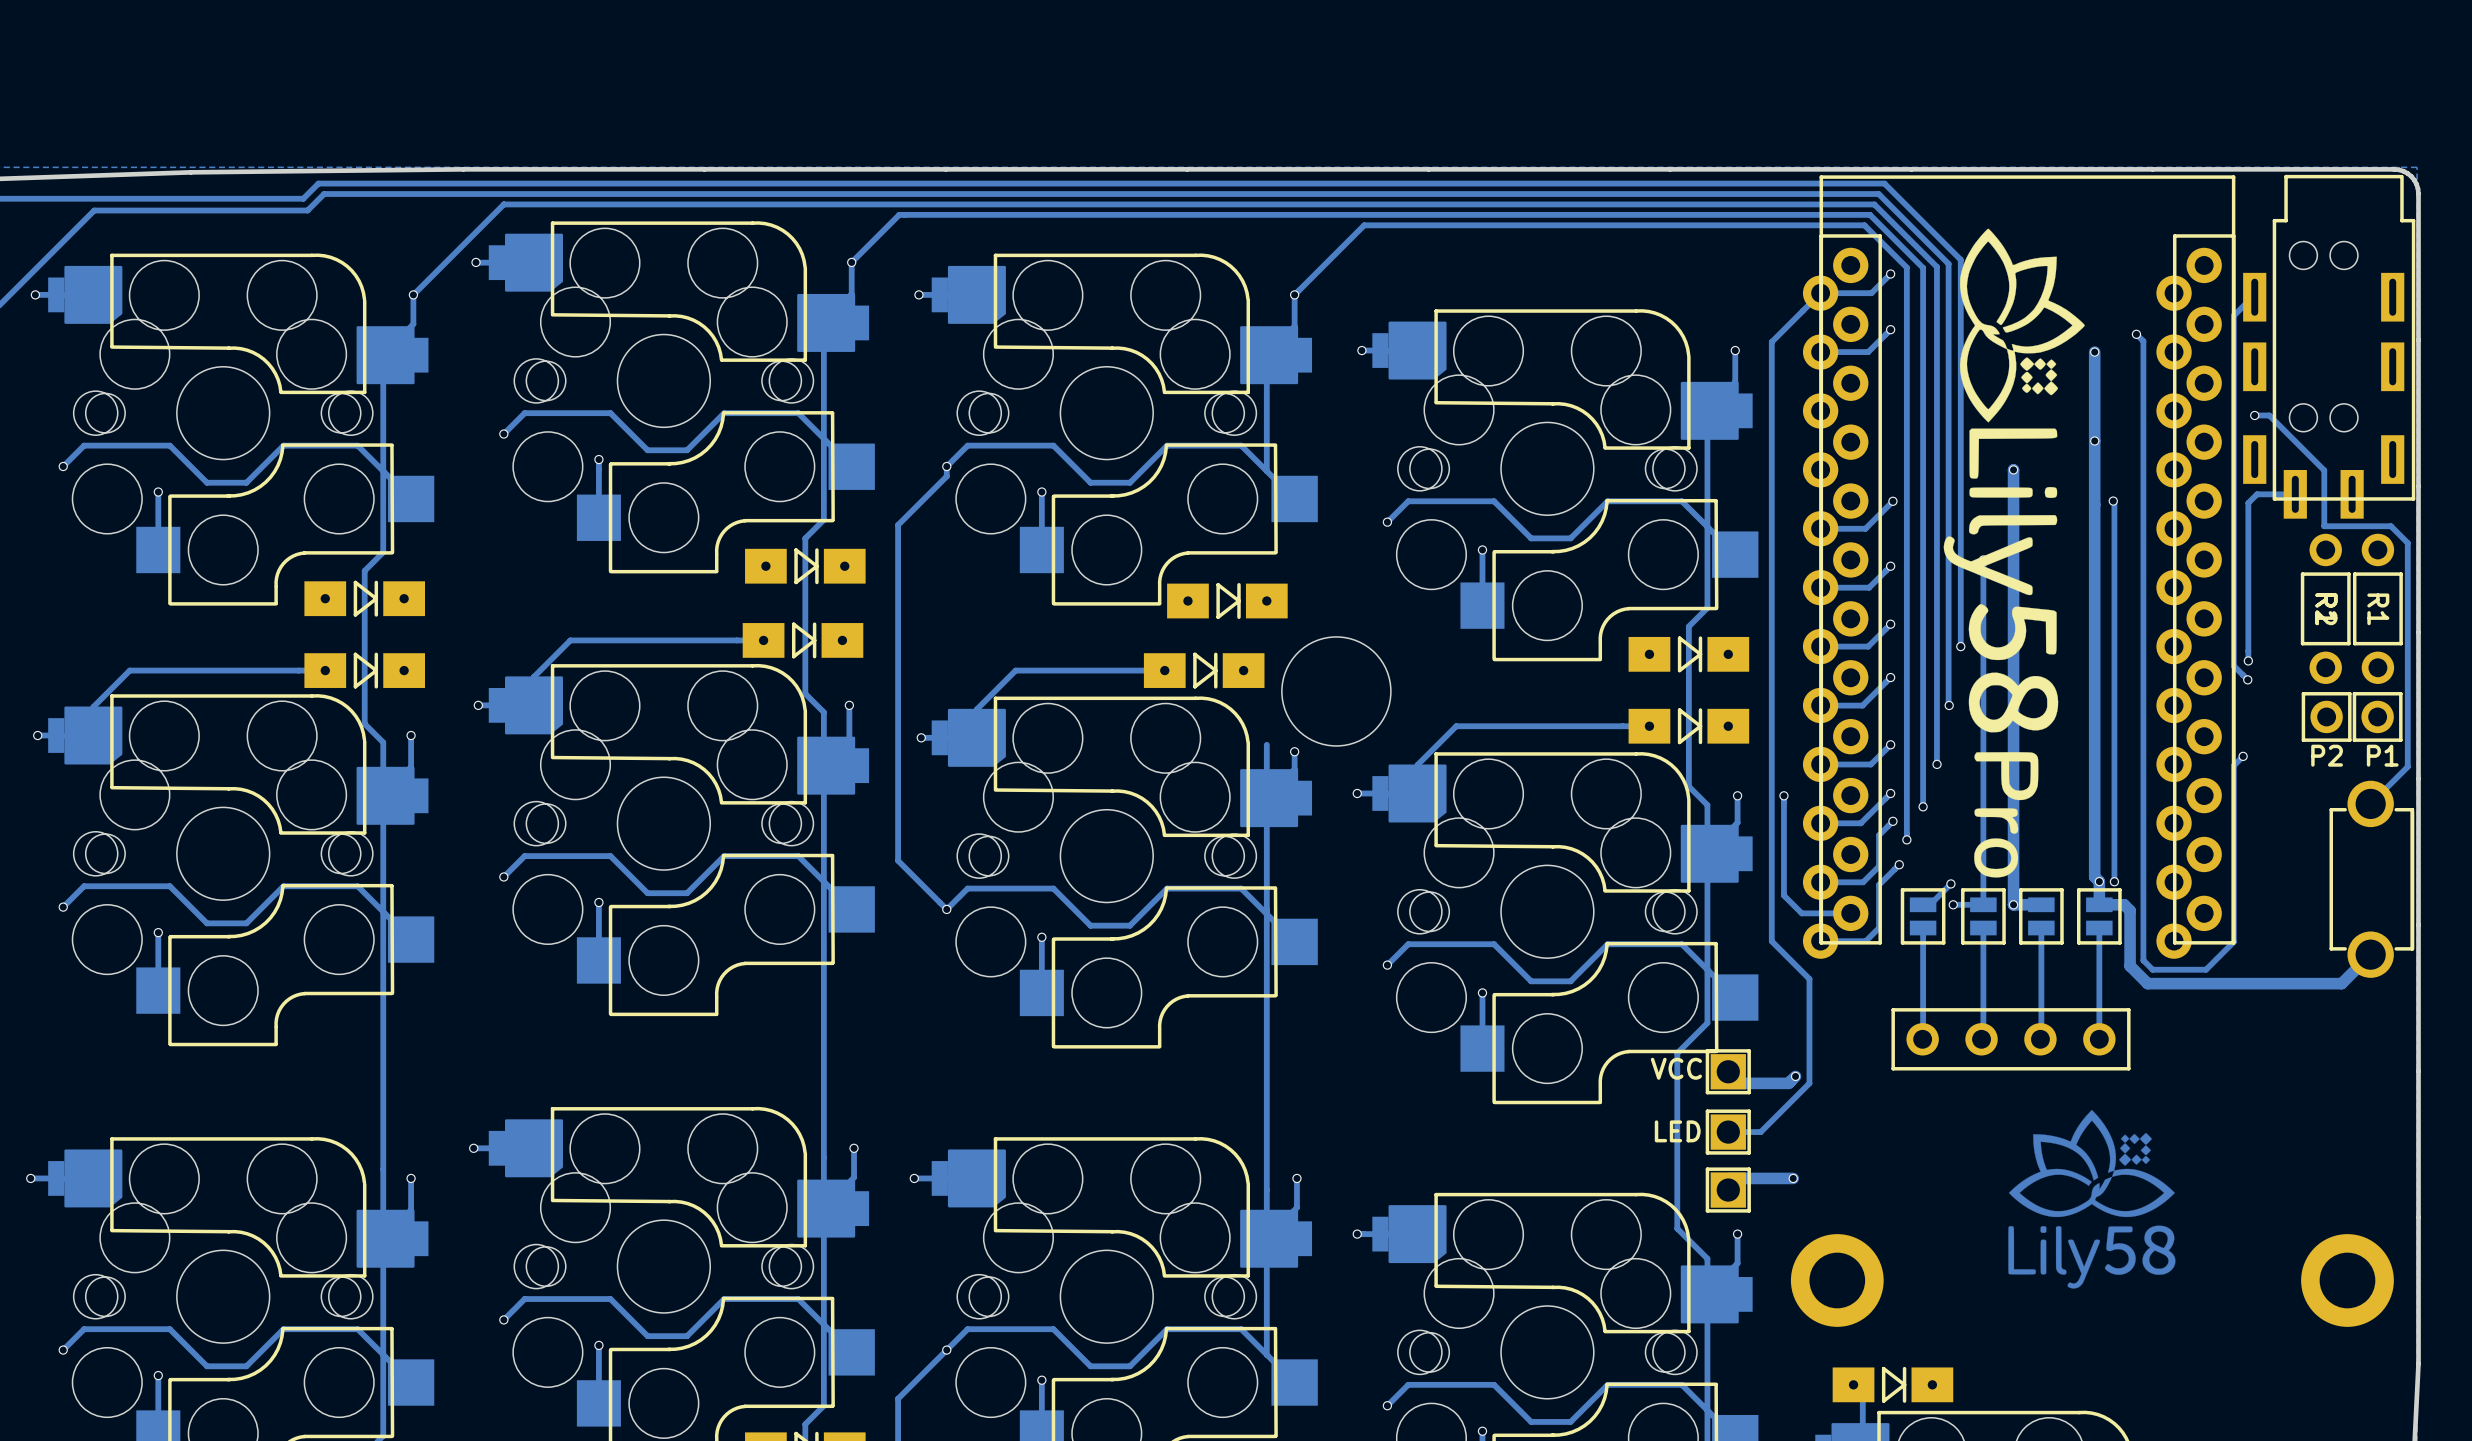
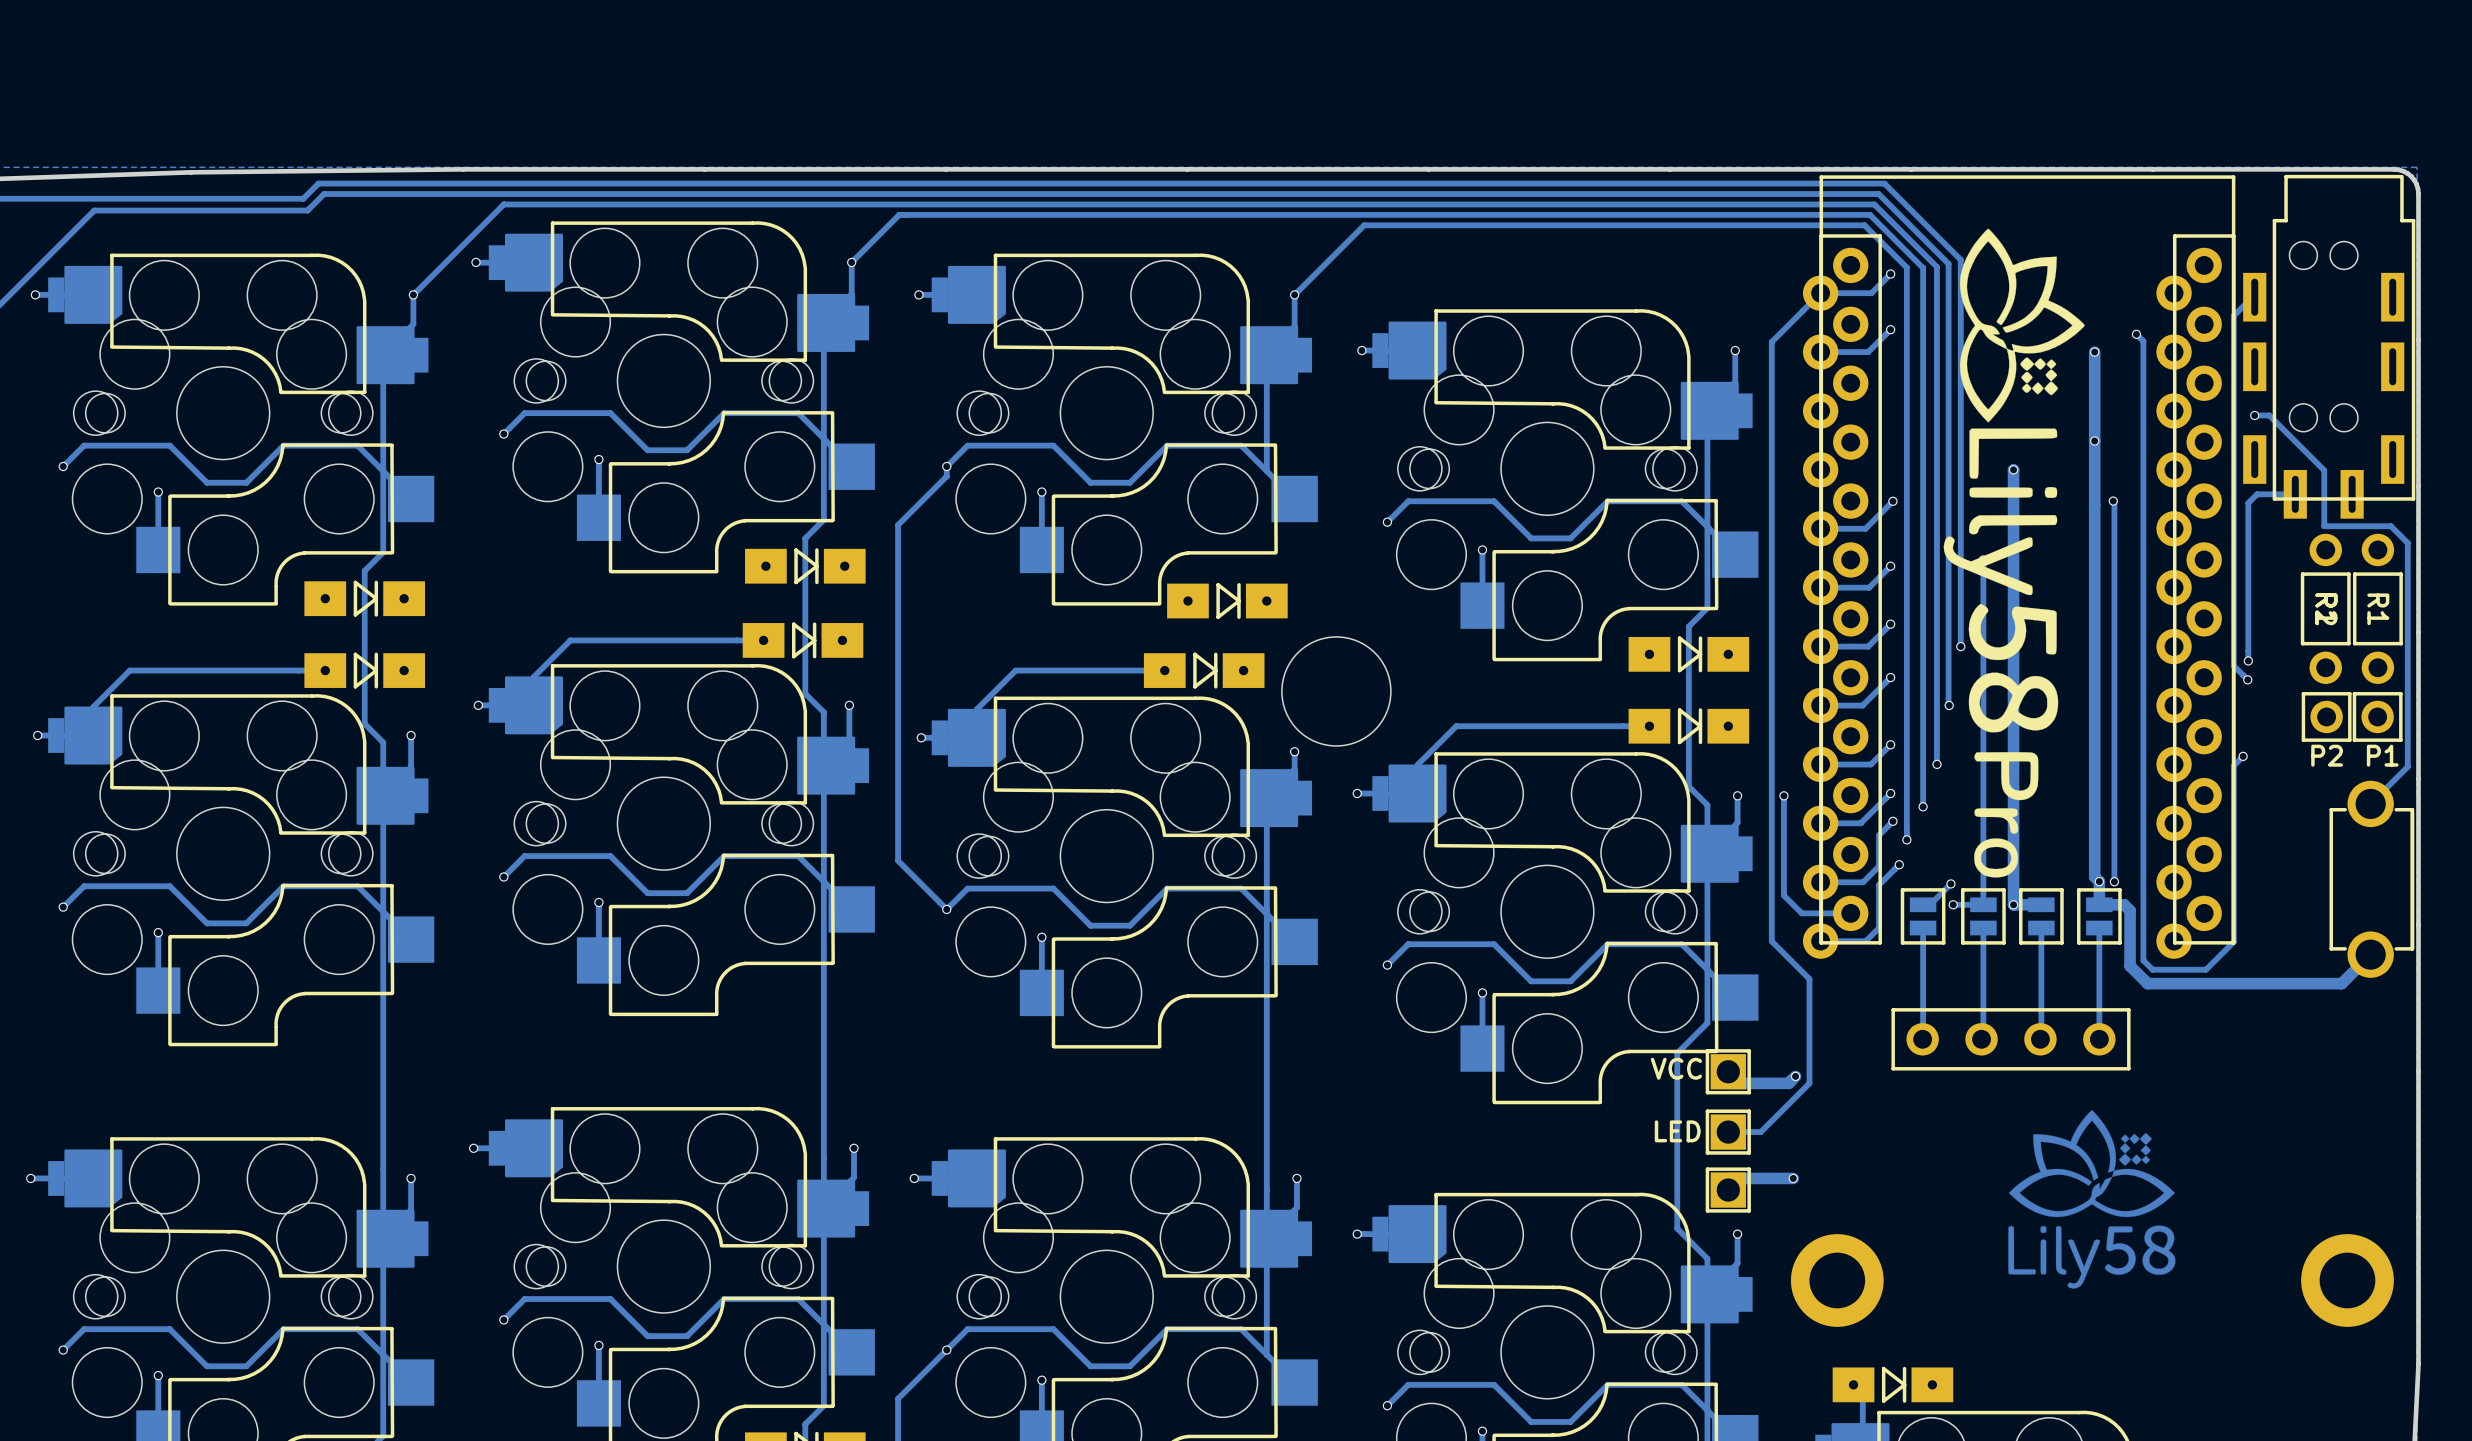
track: (1266, 744) (1266, 797) -> none

